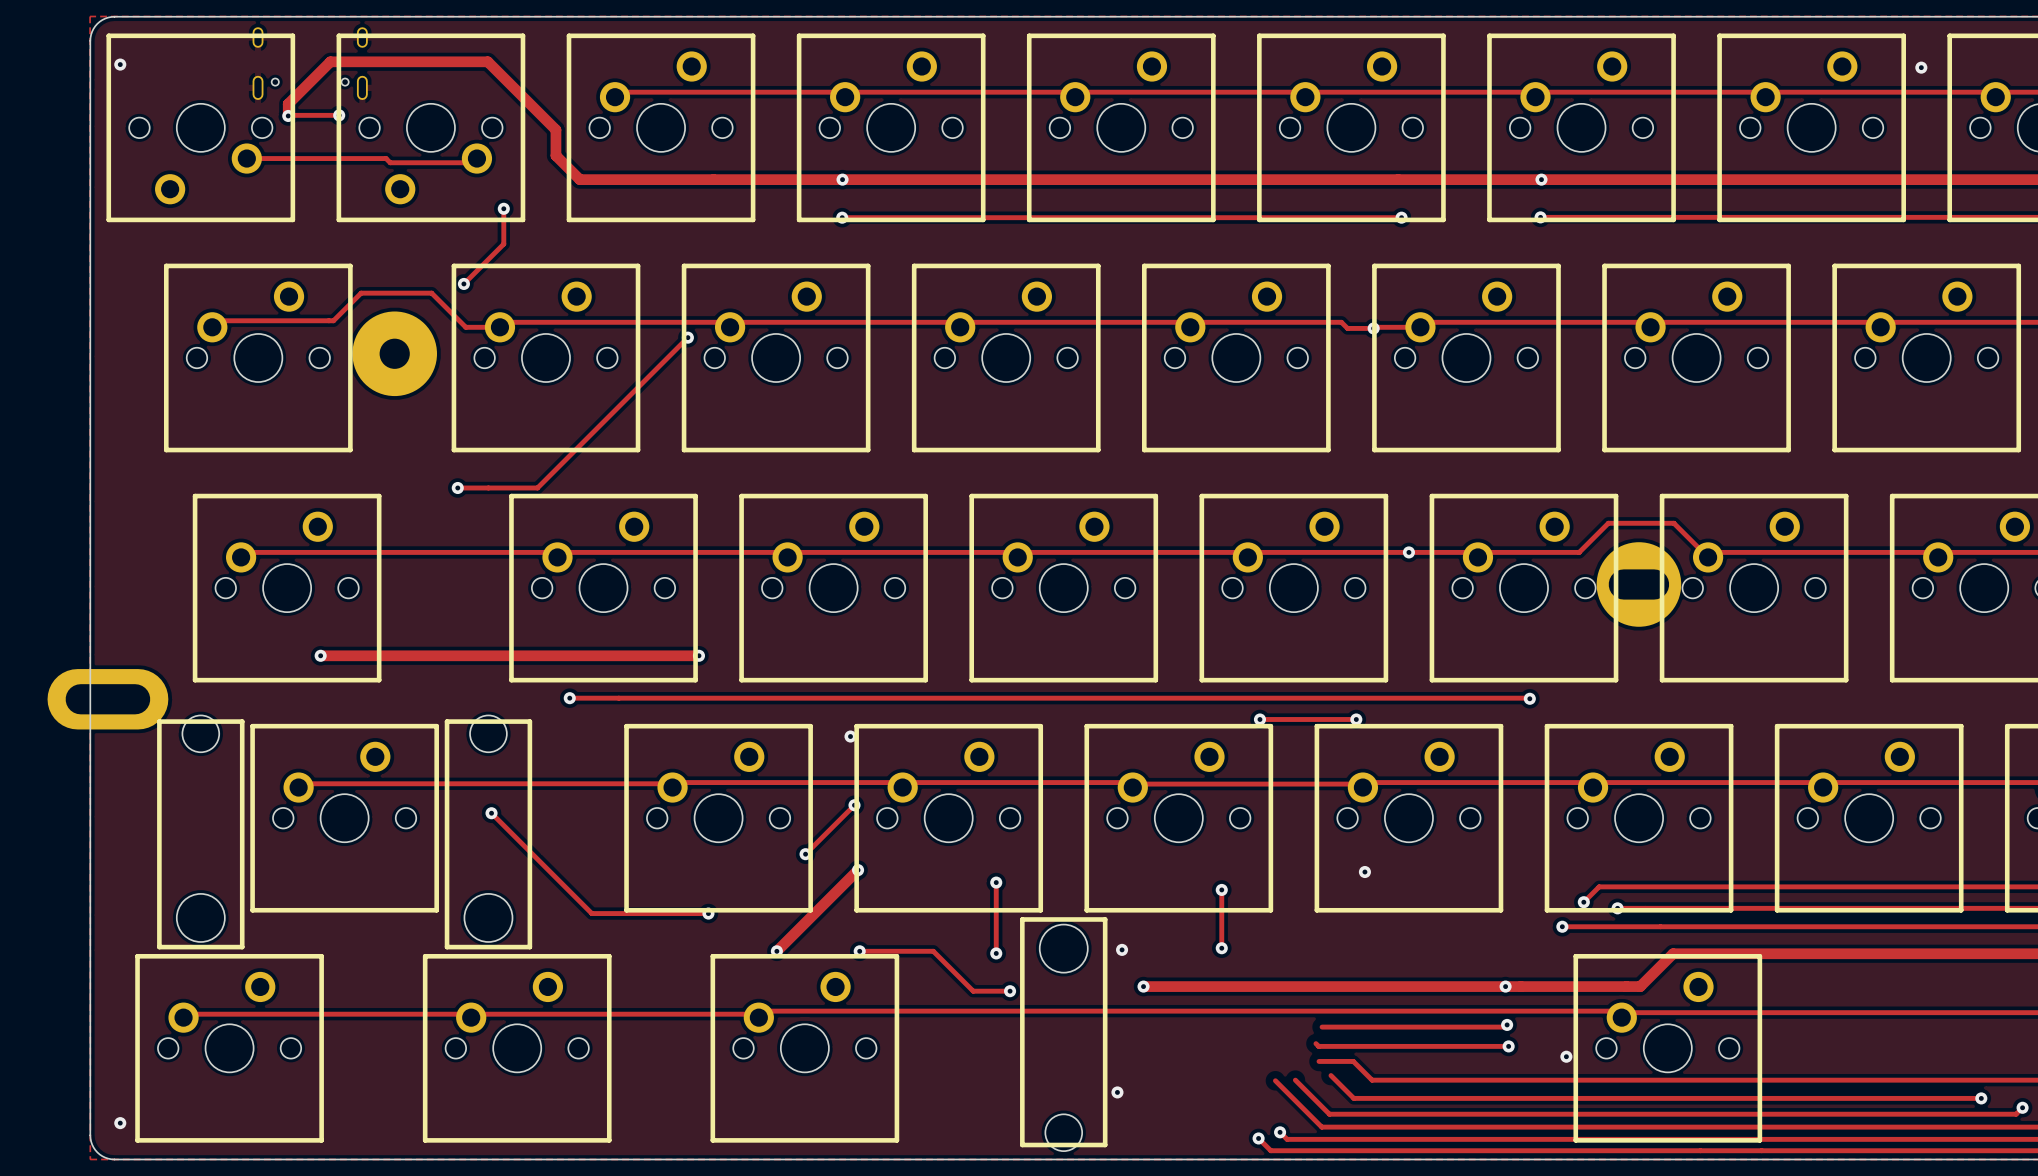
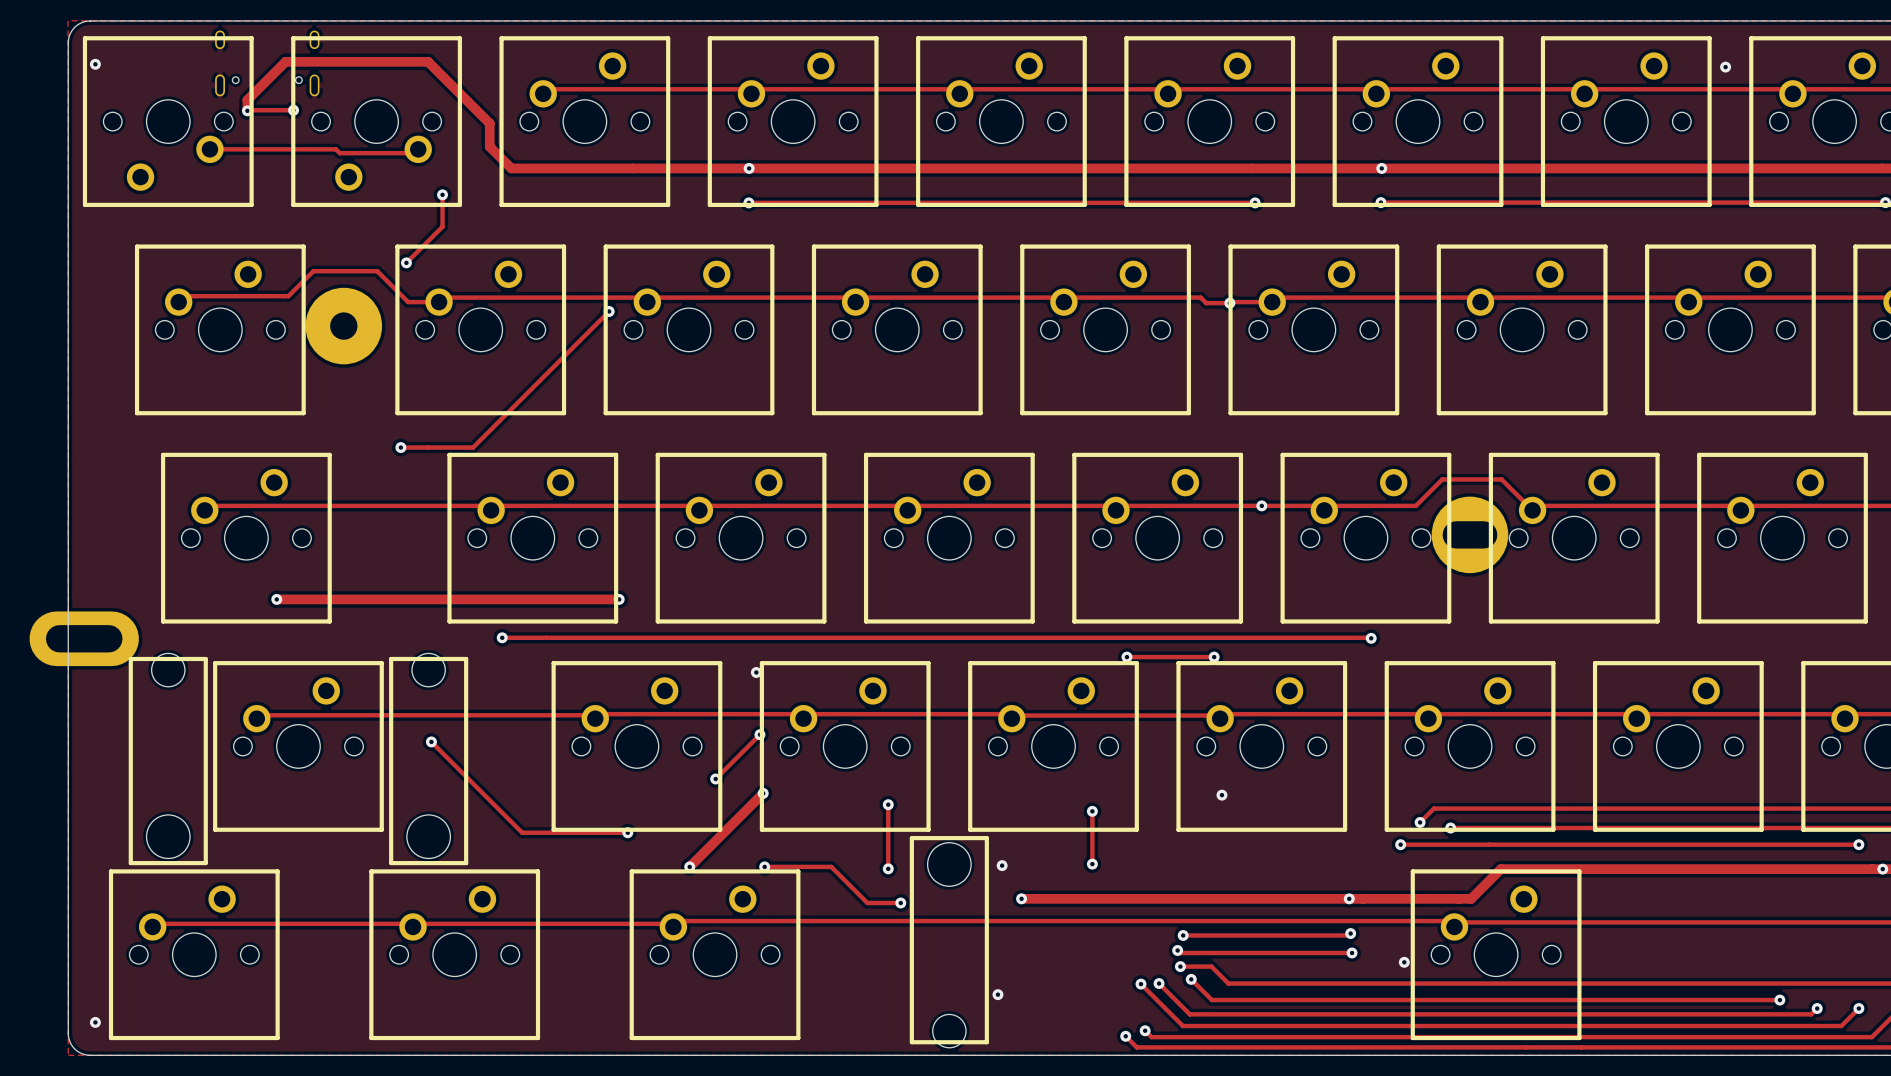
via: none -> (1183, 935)
via: none -> (1177, 950)
via: none -> (1180, 966)
via: none -> (1191, 979)
via: none -> (1140, 984)
via: none -> (1159, 983)

